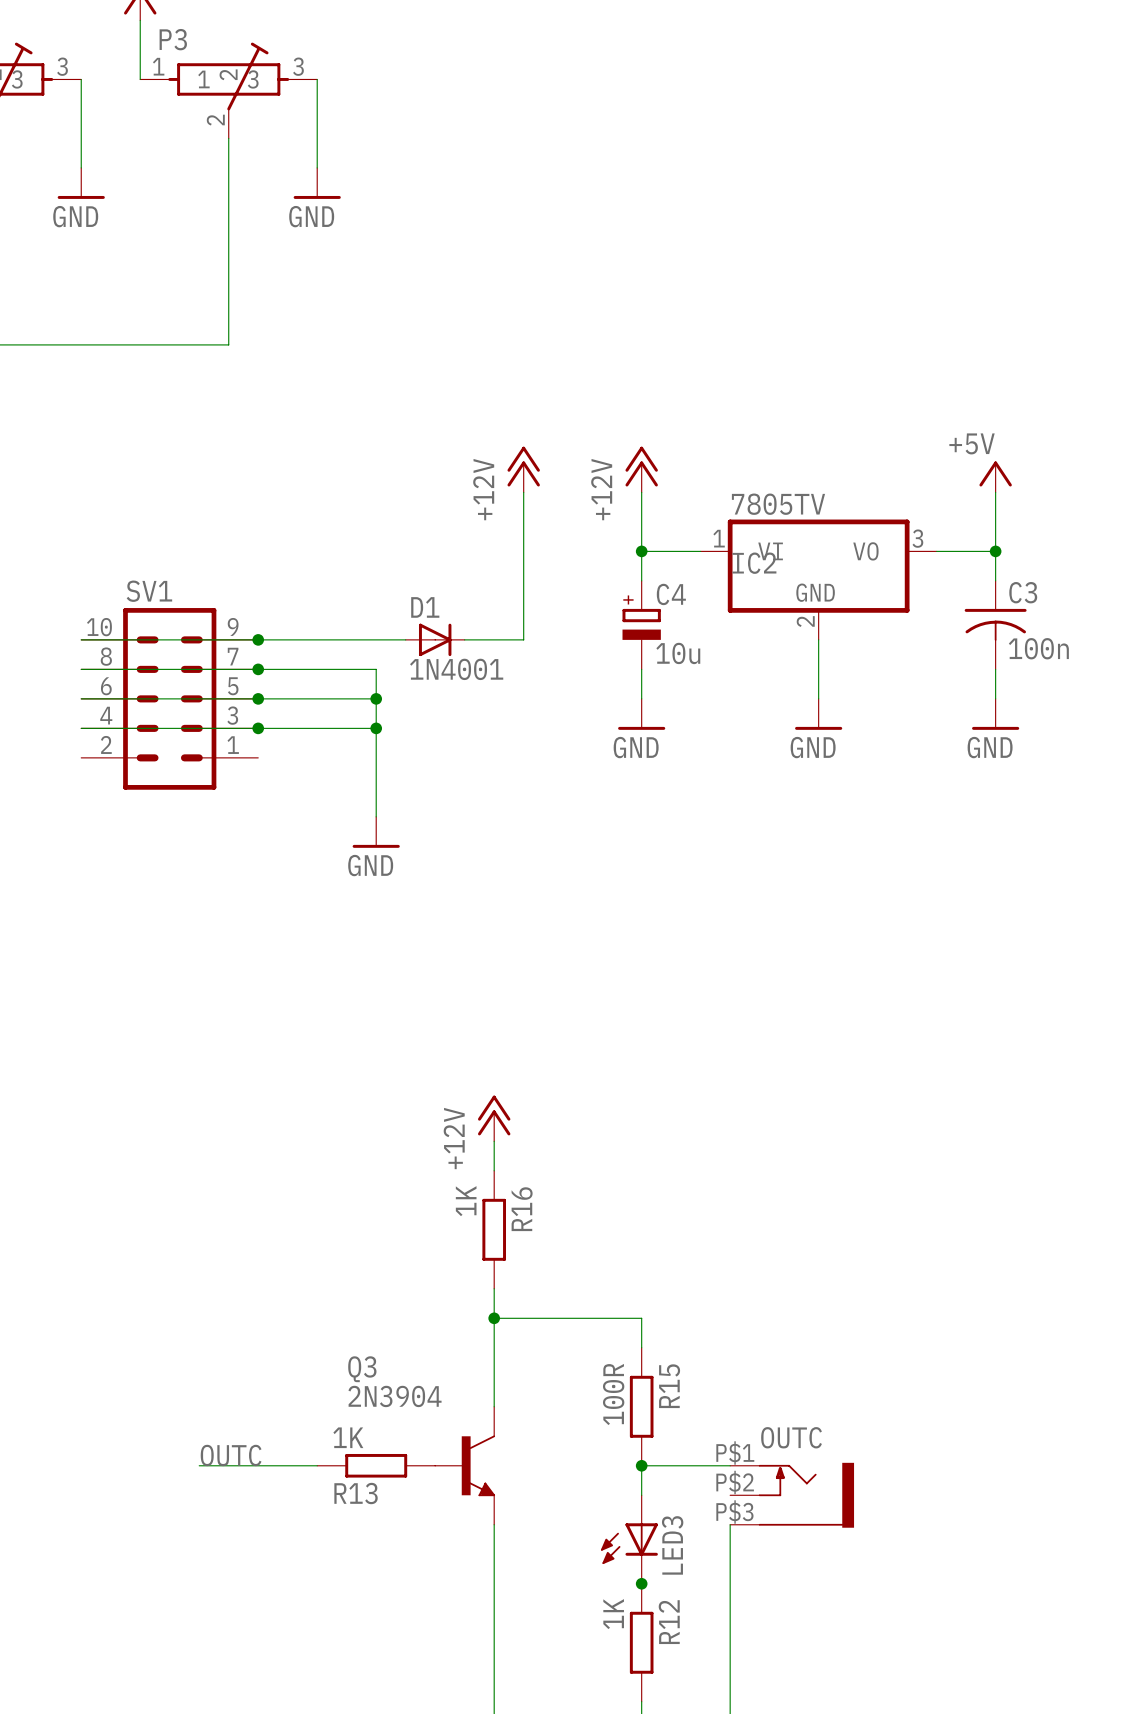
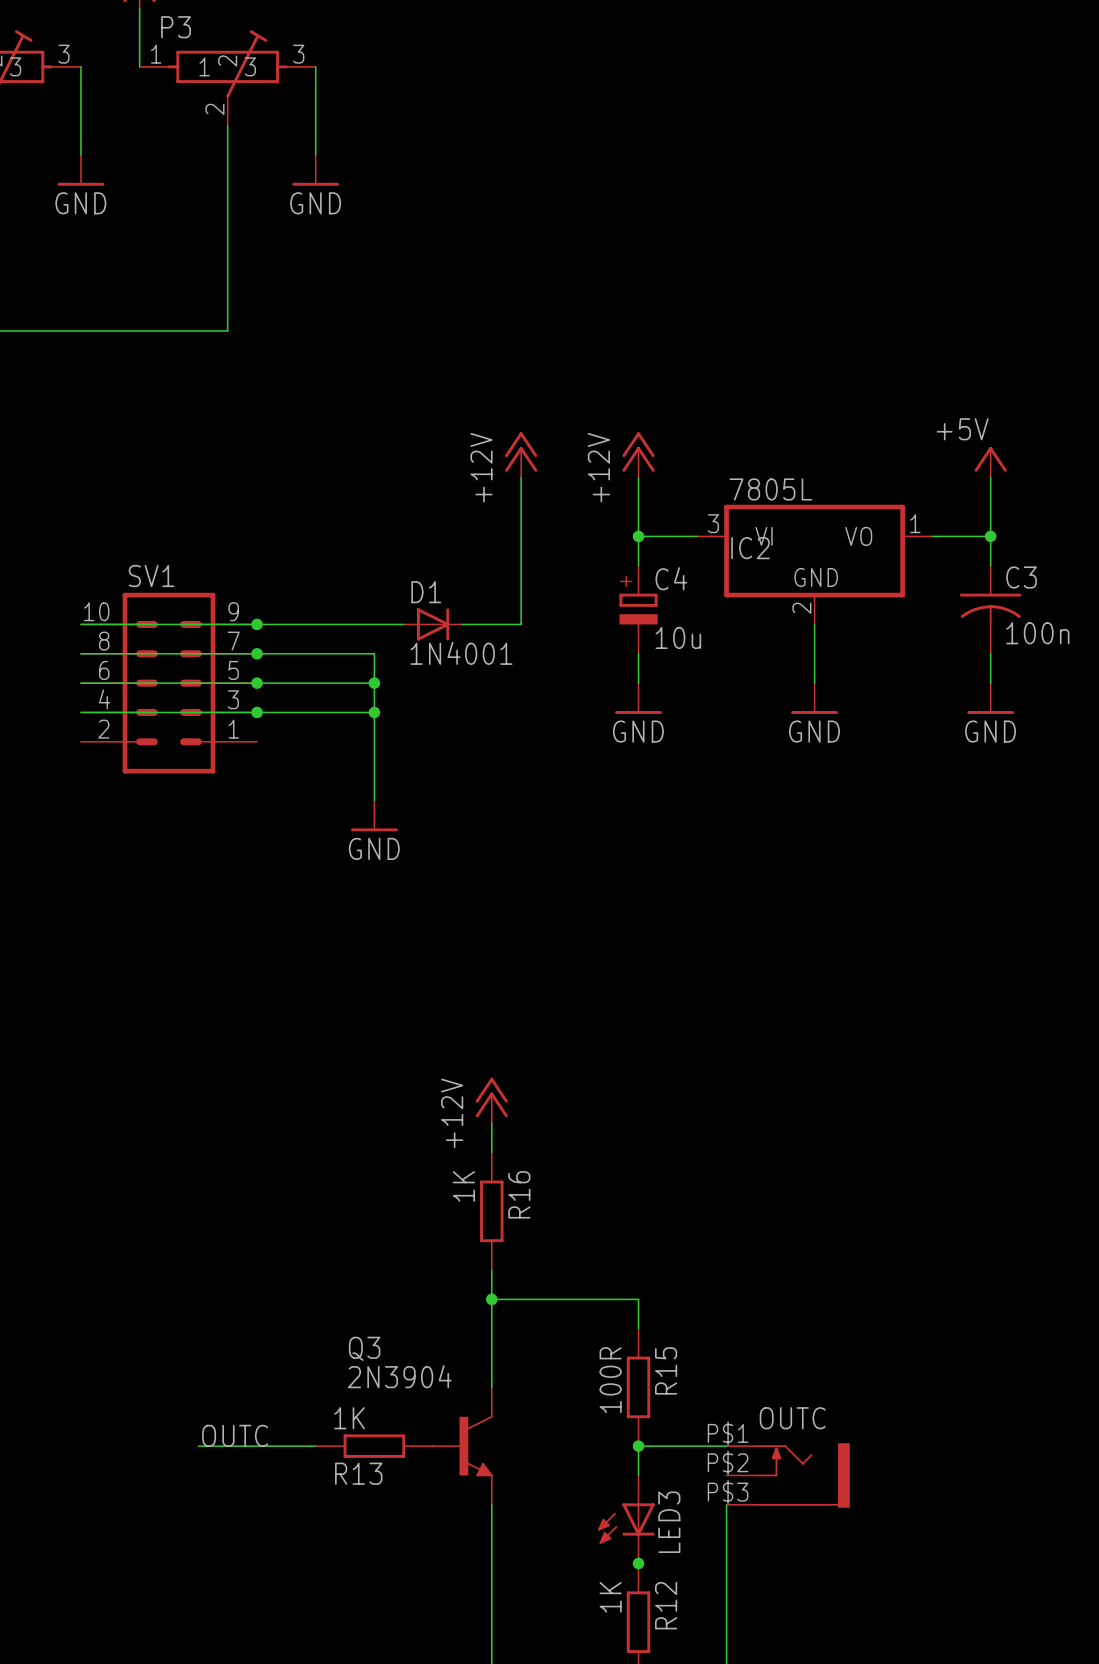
IC2 value: 7805TV (778, 504) -> 7805L (770, 489)
IC2 pin number: 1 (719, 538) -> 3 (713, 523)
IC2 pin number: 3 (917, 538) -> 1 (915, 523)

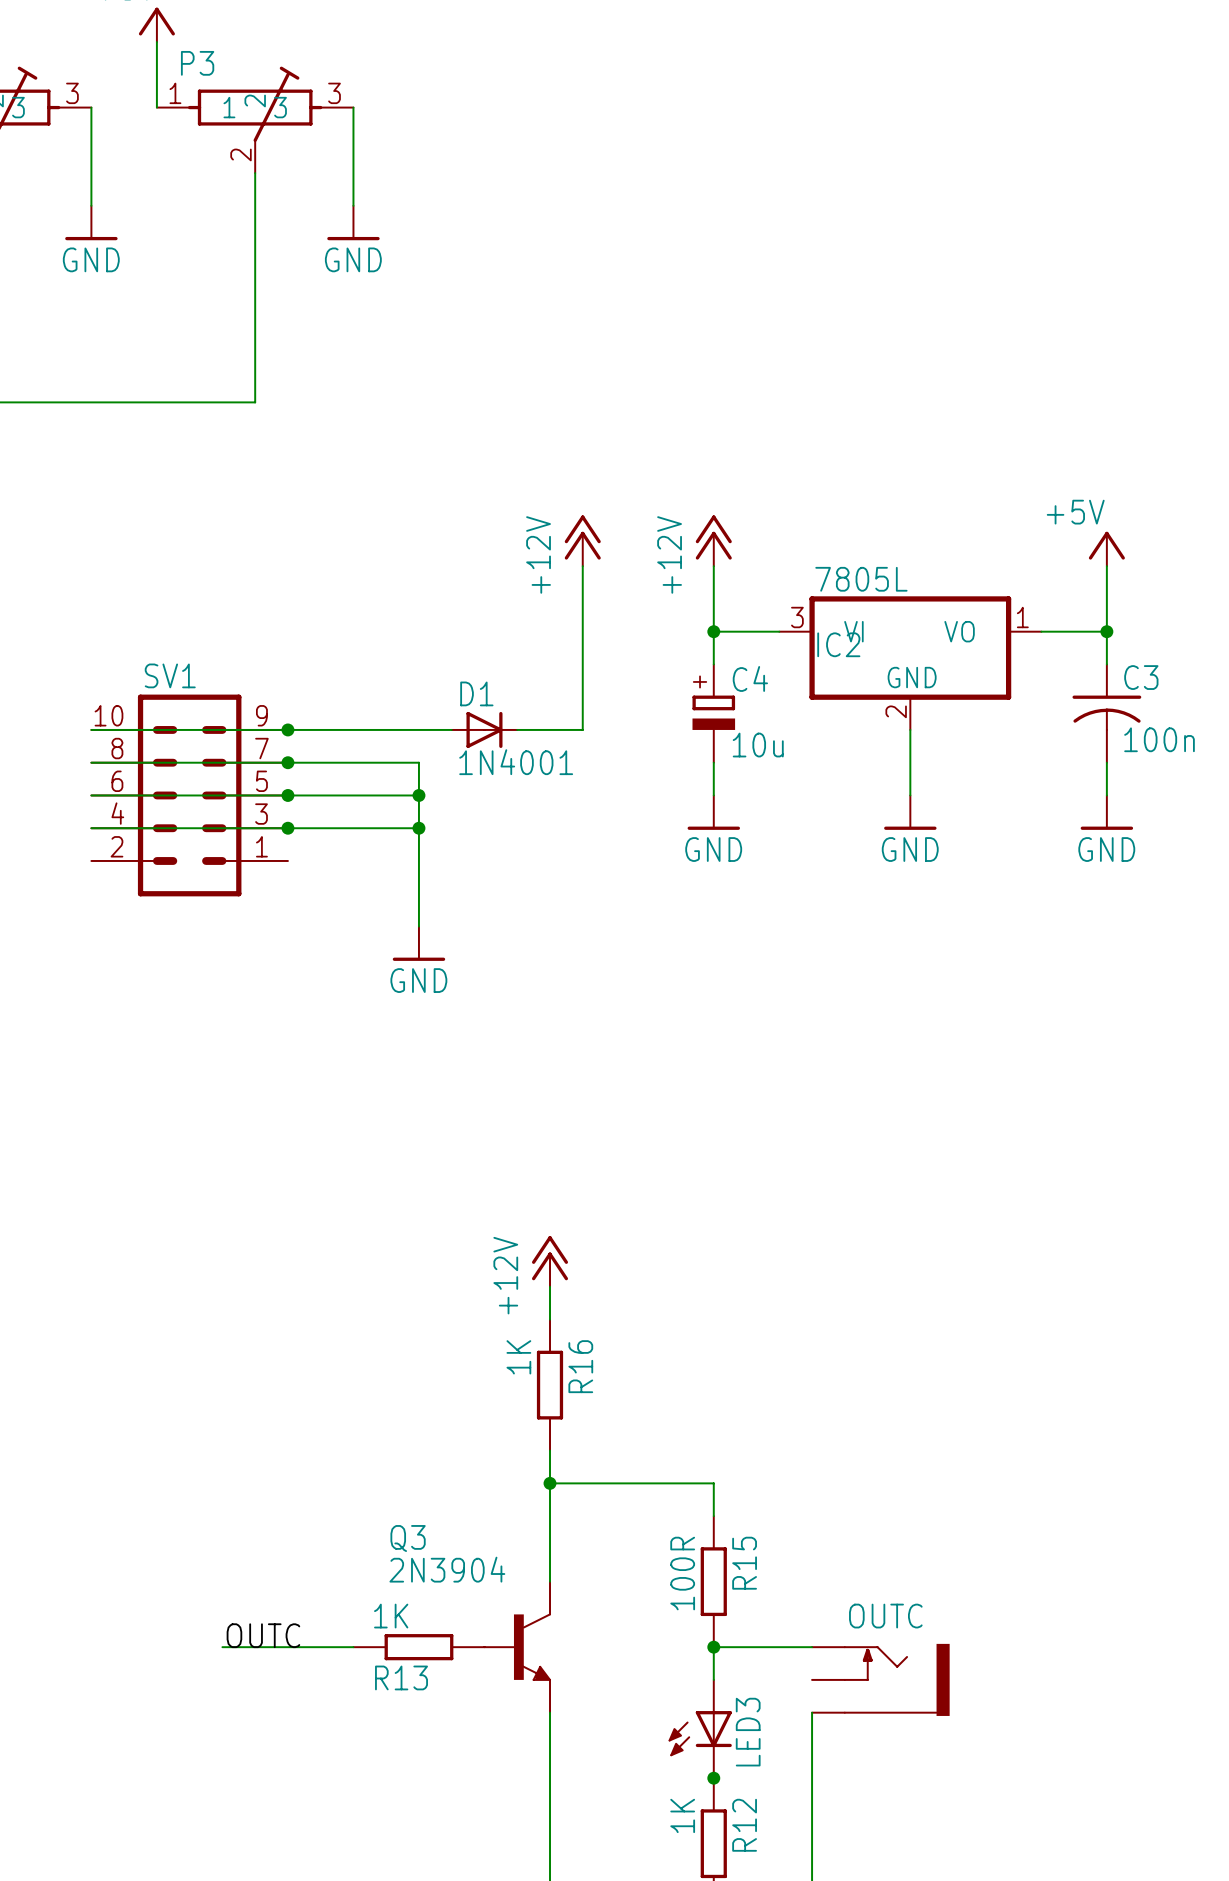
OUTC pin number: P$1 (728, 1433) -> none
OUTC pin number: P$2 (728, 1462) -> none
OUTC pin number: P$3 (728, 1492) -> none

